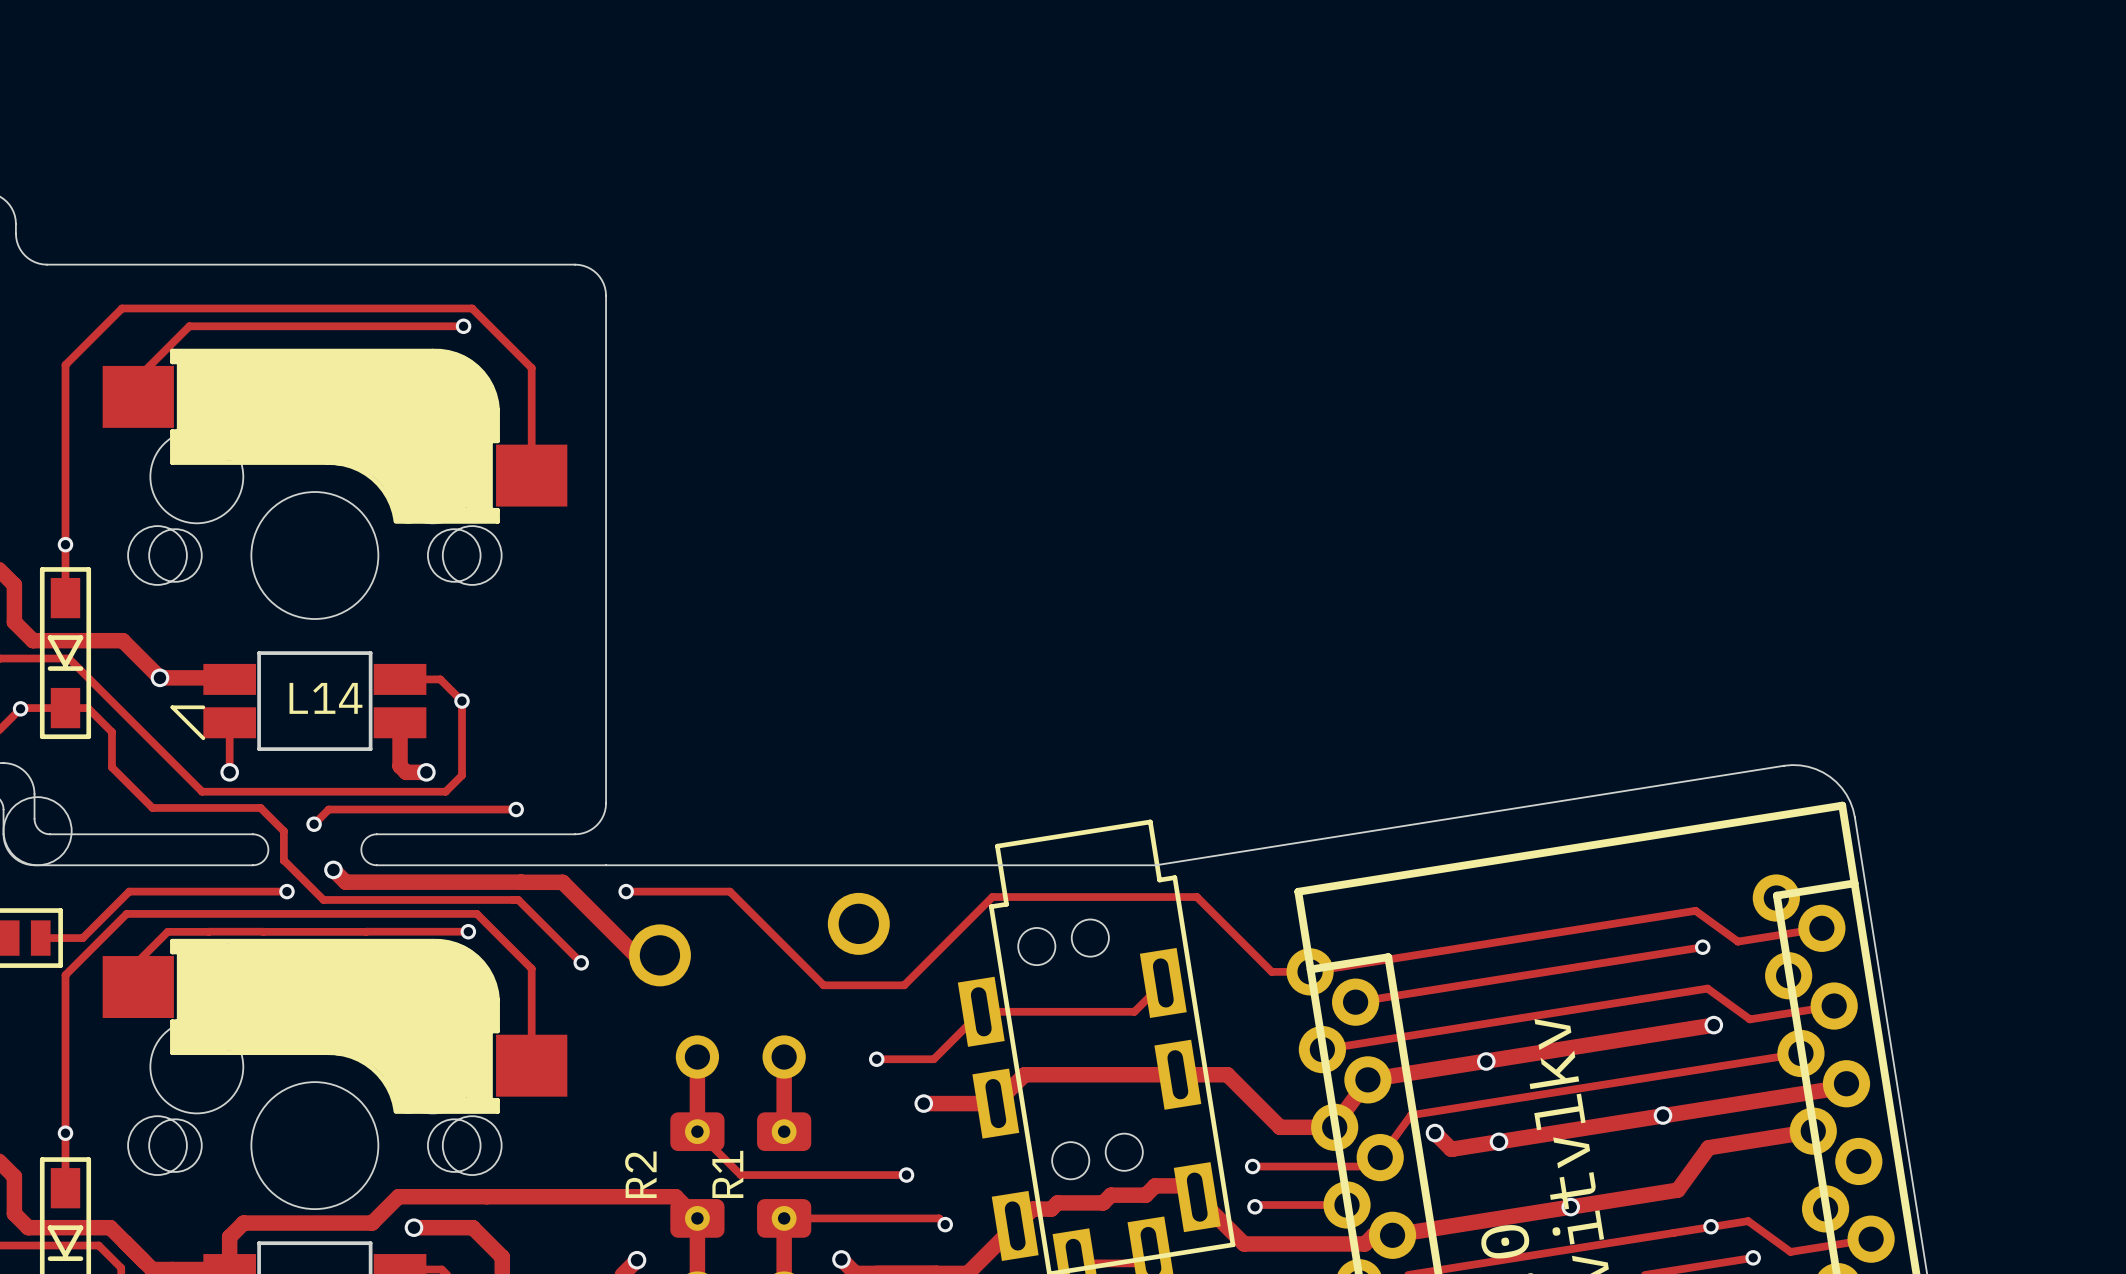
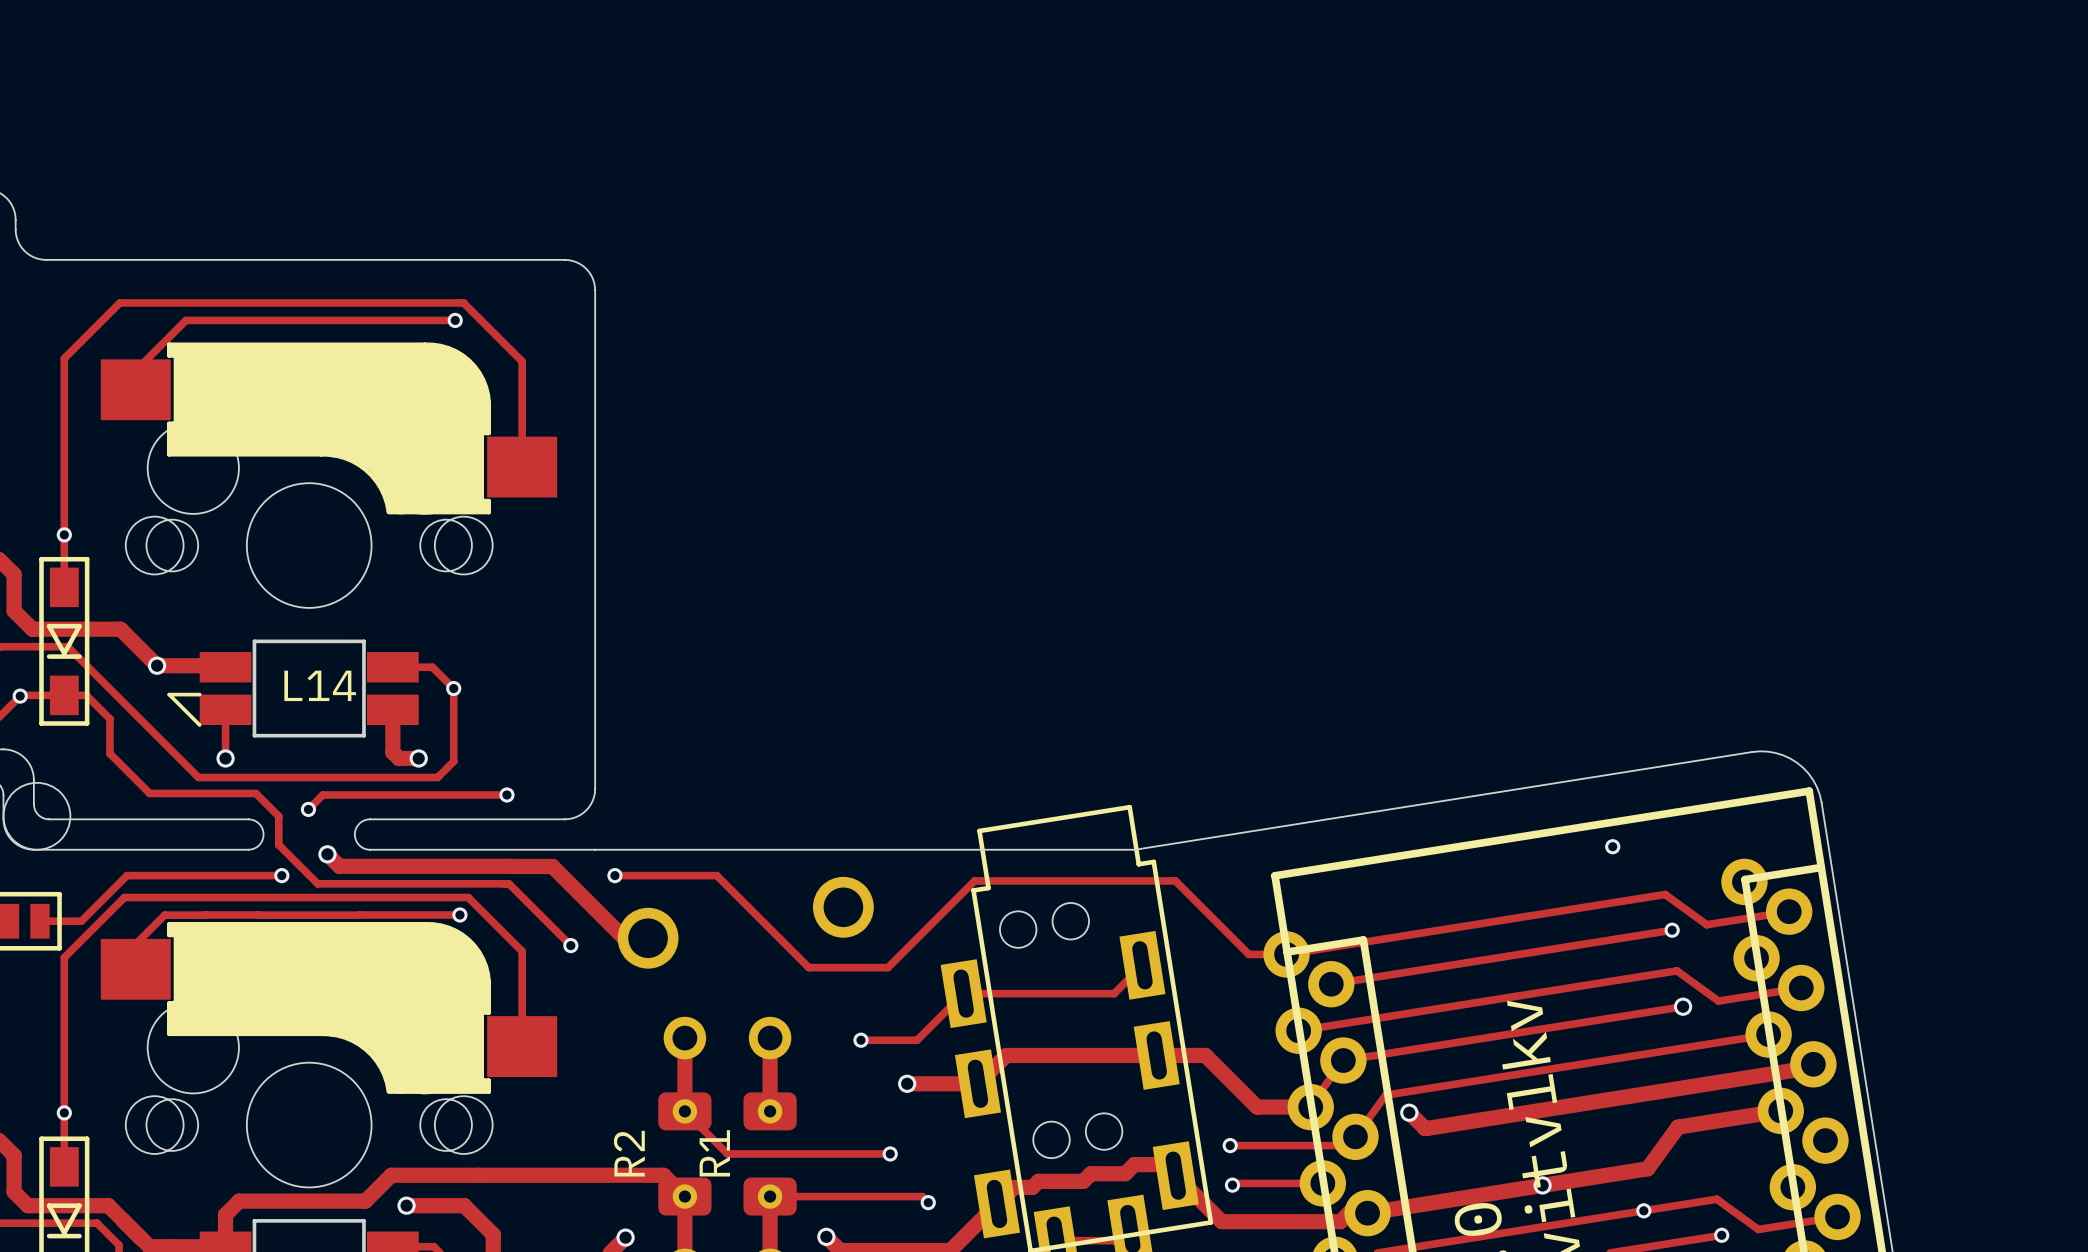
via: none -> (1612, 846)
track width: thick (1713, 1025) (1367, 1079) (1334, 1125) -> thin (1683, 1006) (1343, 1060) (1310, 1105)
via: (1486, 1061) -> none
via: (1662, 1115) -> none
via: (1498, 1141) -> none
via position: (1711, 1226) -> (1643, 1210)

